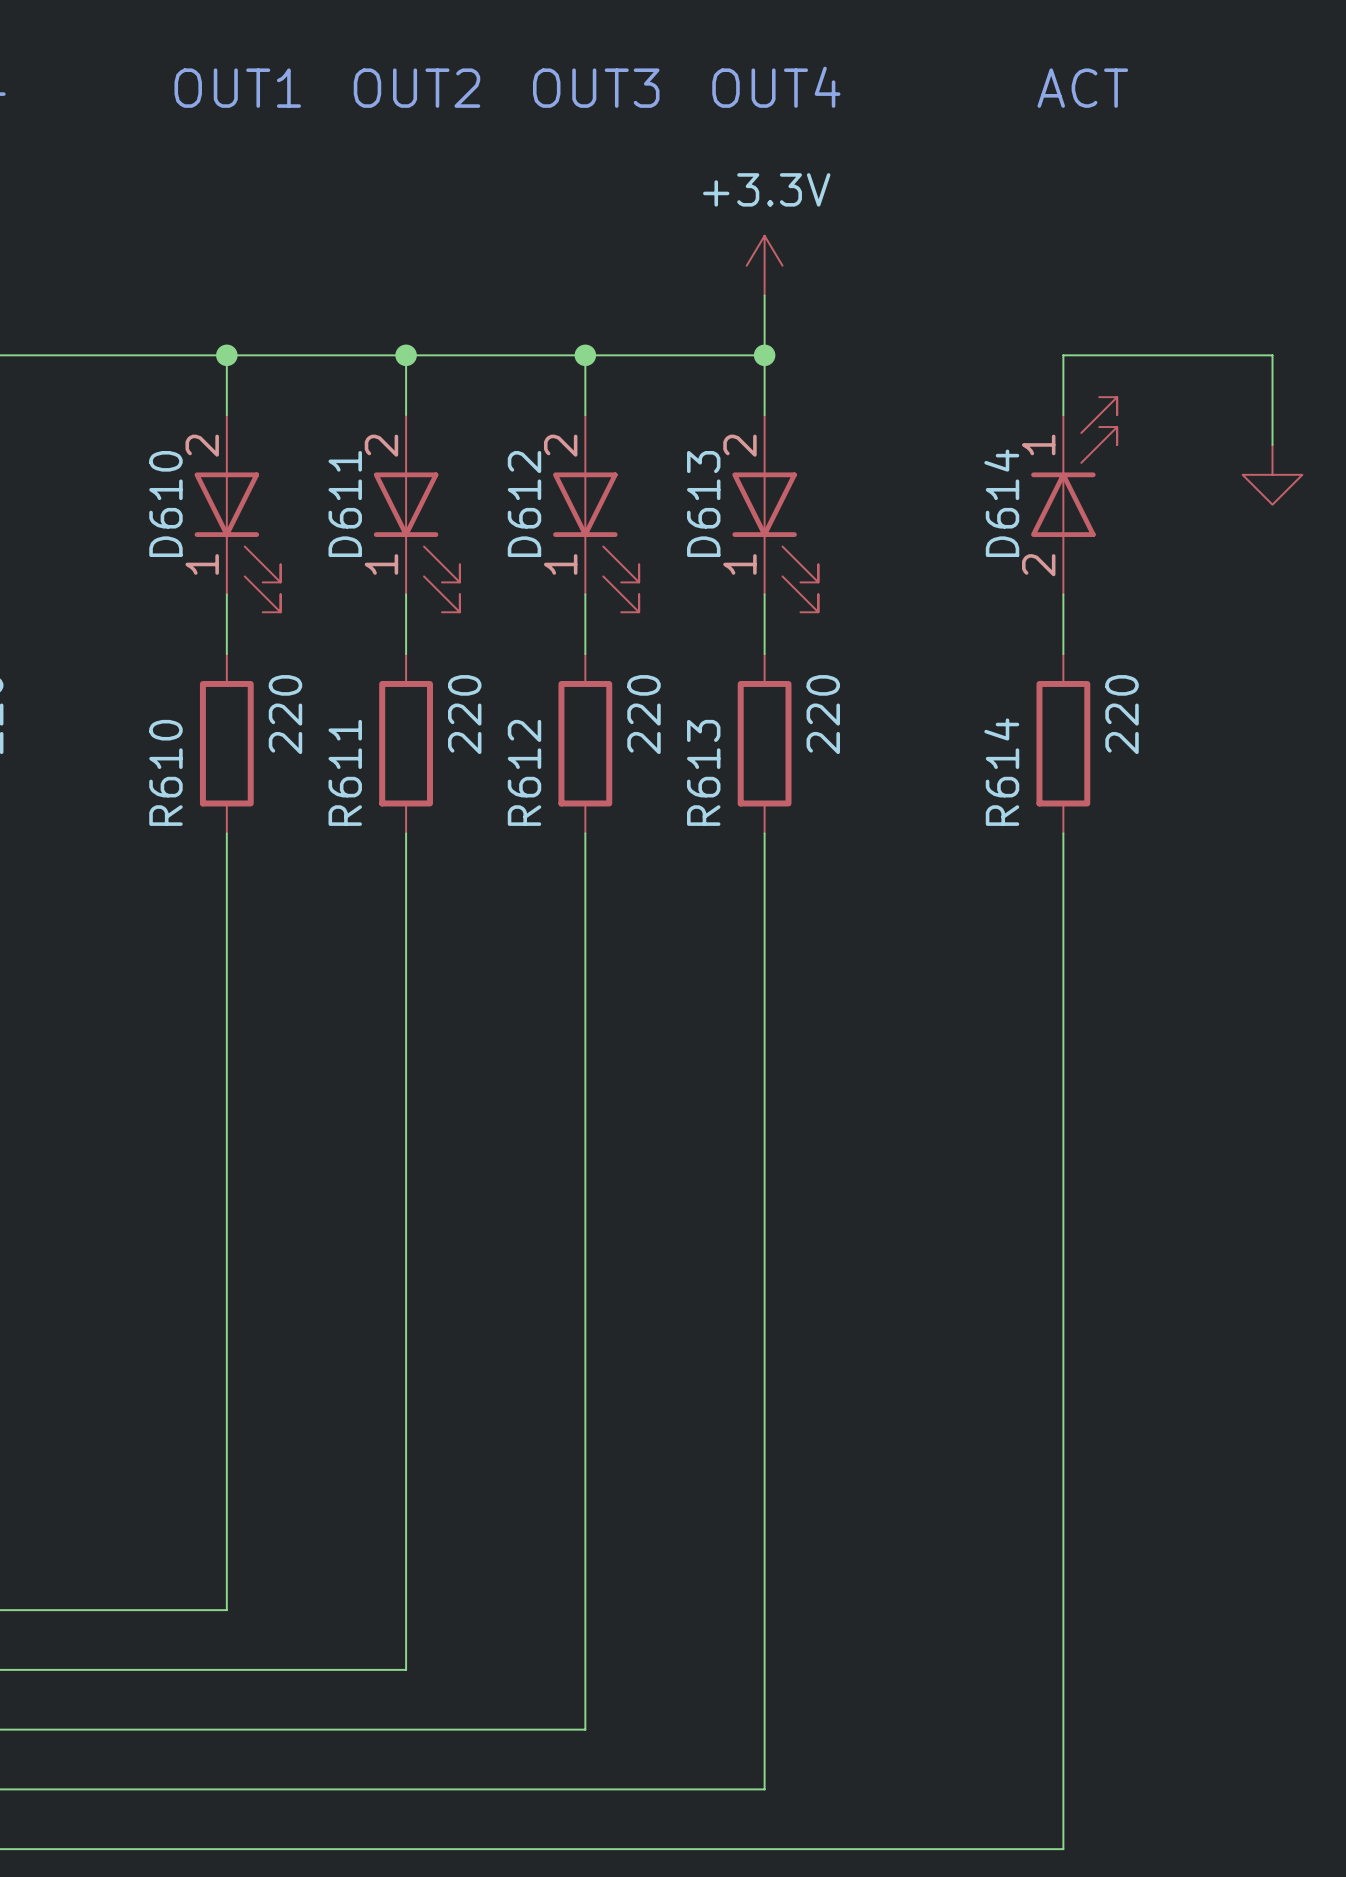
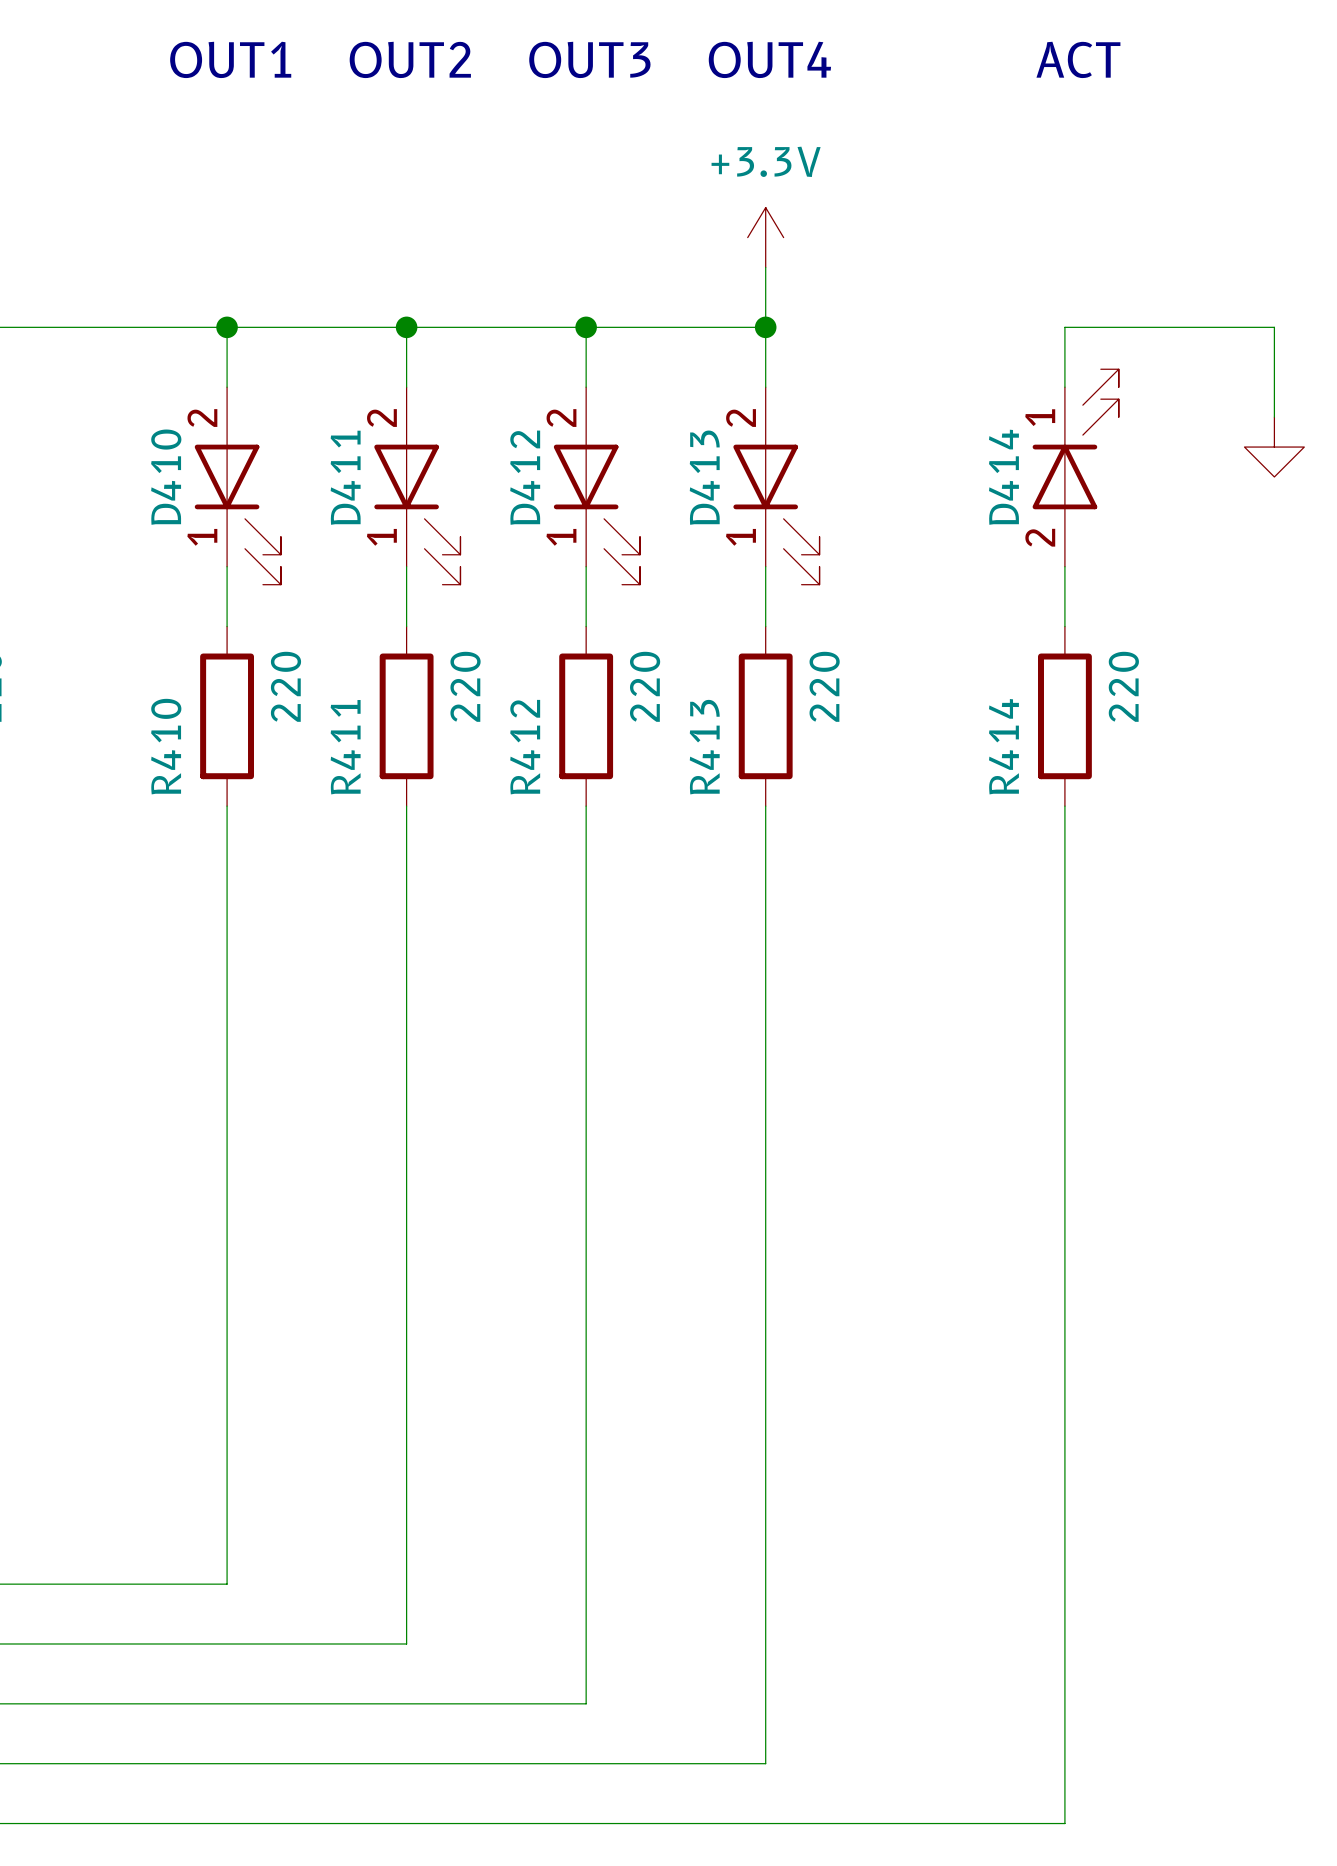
D614 name: D614 (1001, 503) -> D414 (1003, 477)
D610 name: D610 (165, 504) -> D410 (166, 477)
D611 name: D611 (345, 504) -> D411 (345, 477)
D612 name: D612 (524, 504) -> D412 (525, 477)
D613 name: D613 (703, 504) -> D413 (704, 477)
R610 name: R610 (165, 772) -> R410 (166, 746)
R611 name: R611 (345, 772) -> R411 (345, 747)
R612 name: R612 (524, 772) -> R412 (525, 747)
R613 name: R613 (703, 772) -> R413 (704, 747)
R614 name: R614 (1001, 772) -> R414 (1003, 746)

